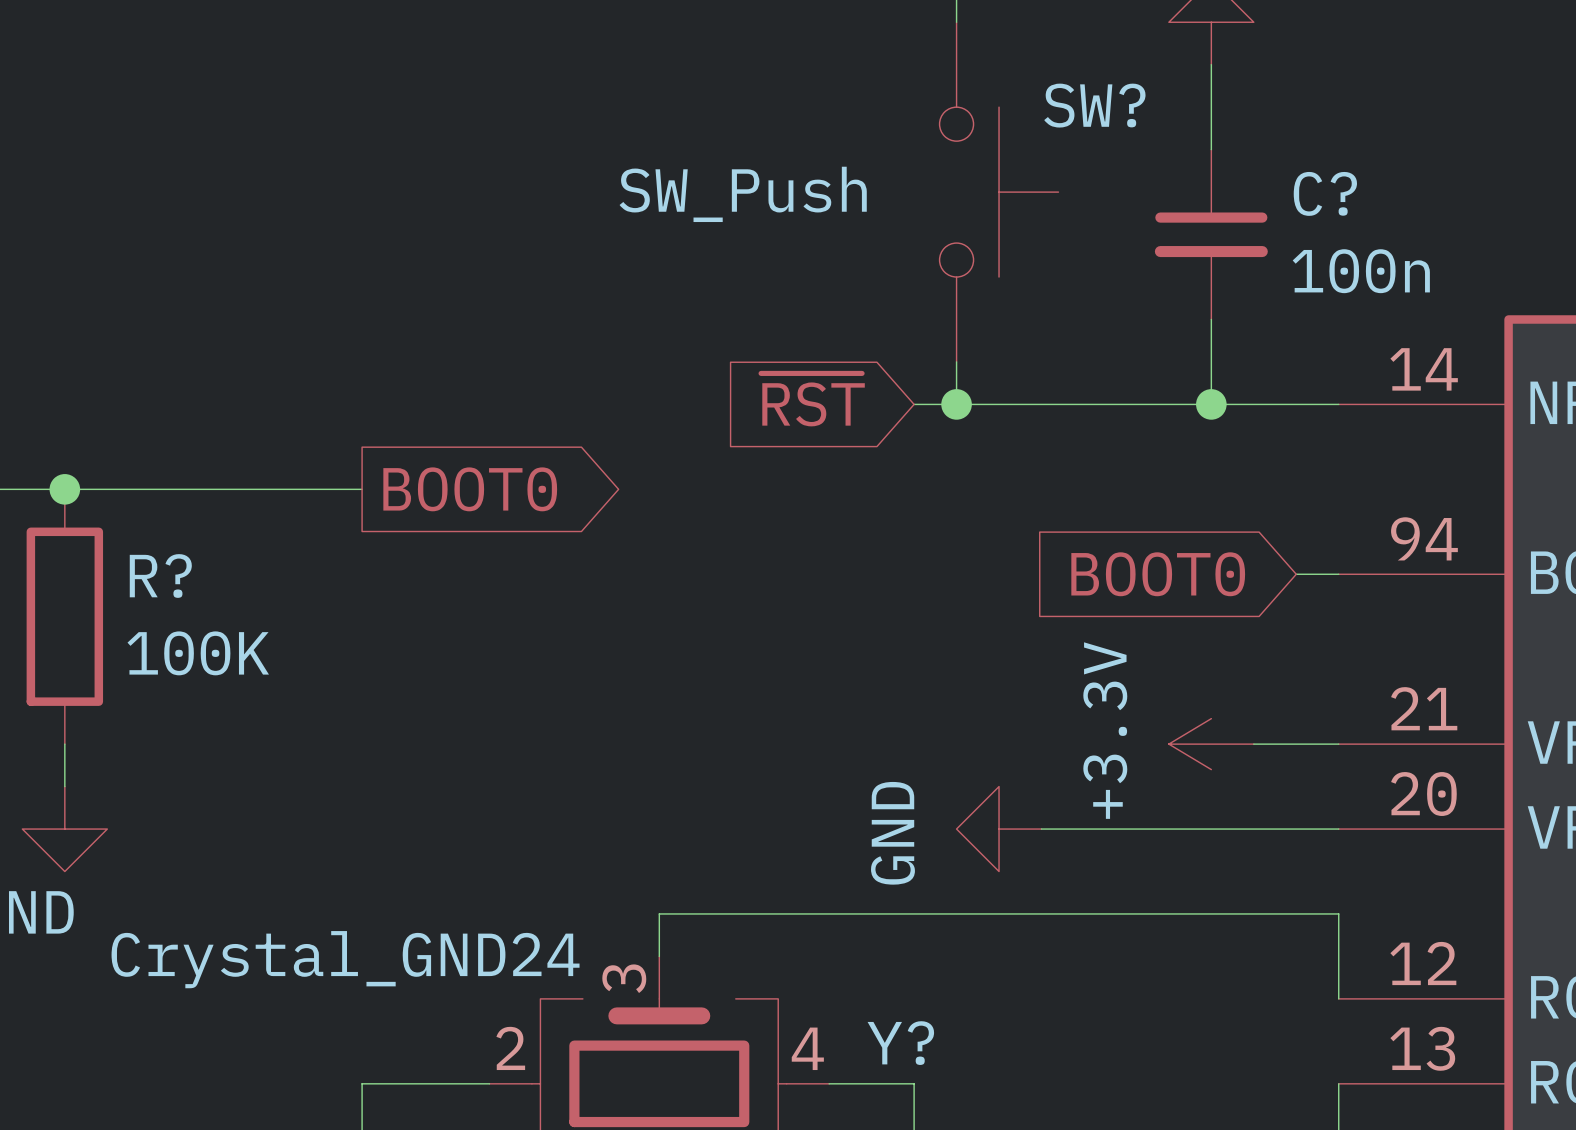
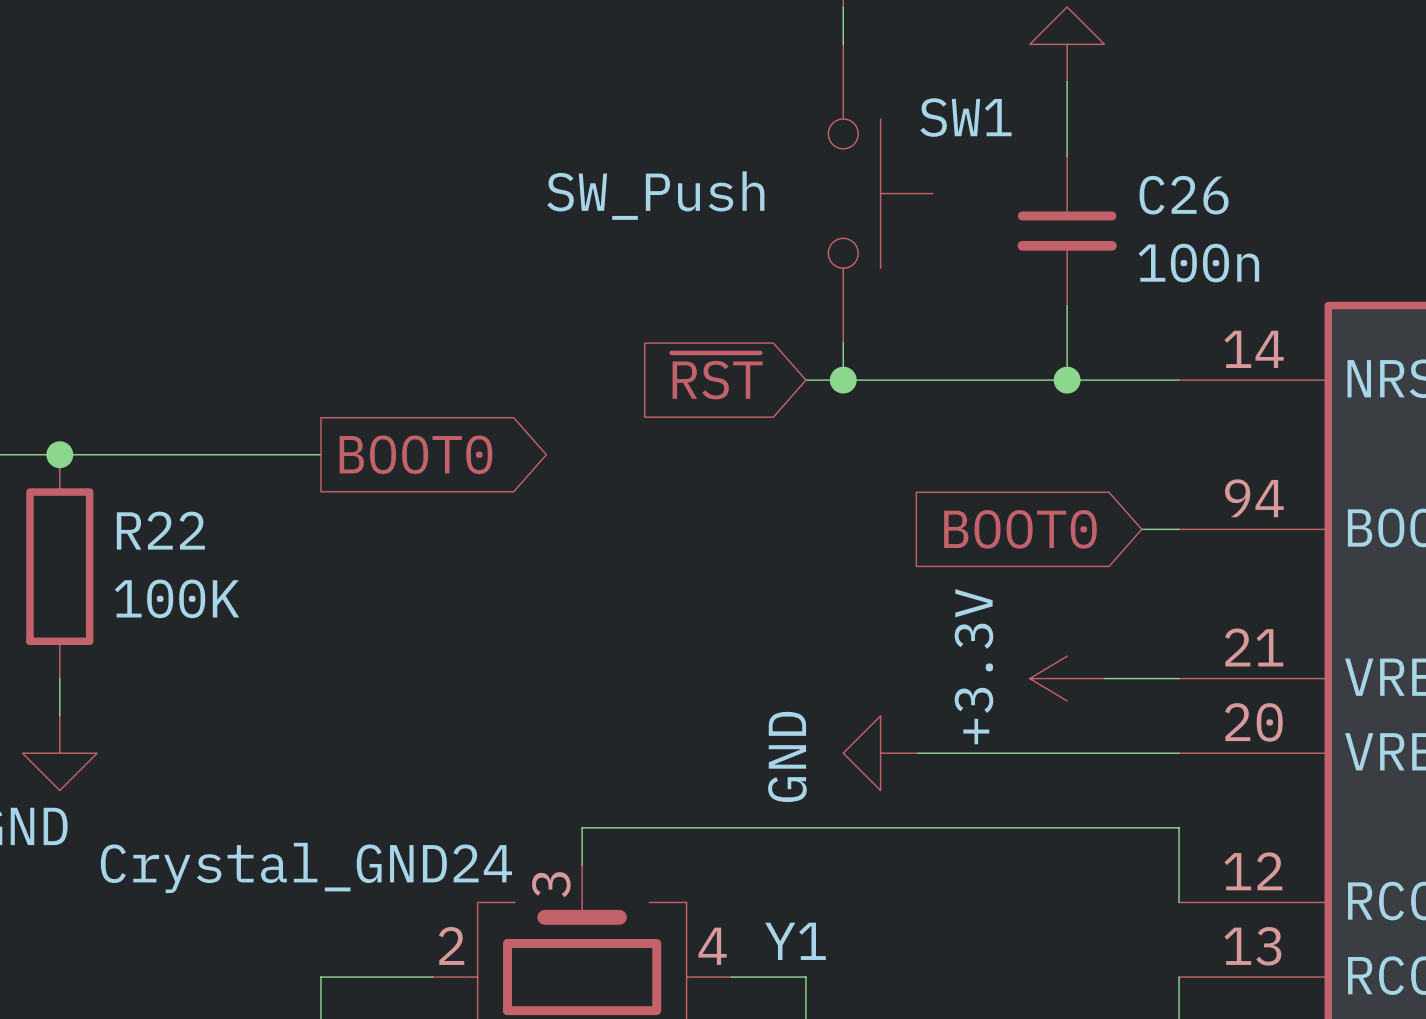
SW? name: SW? (1094, 105) -> SW1 (965, 117)
C? name: C? (1325, 193) -> C26 (1184, 195)
R? name: R? (160, 575) -> R22 (160, 530)
Y? name: Y? (900, 1043) -> Y1 (795, 941)

